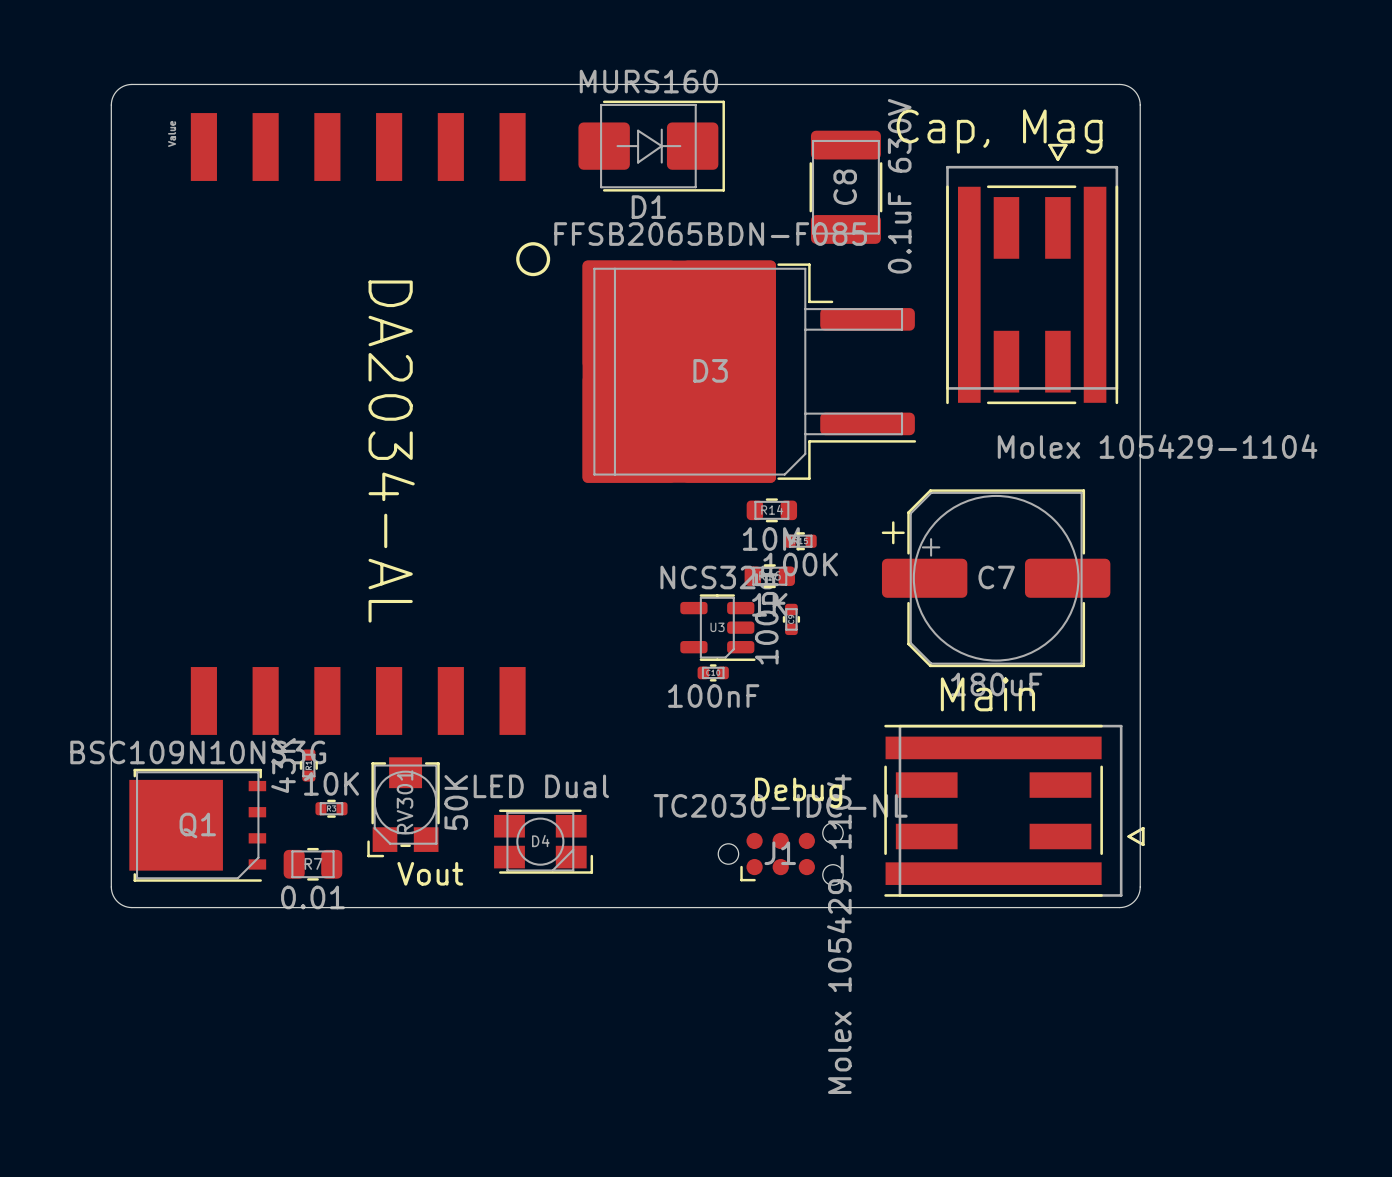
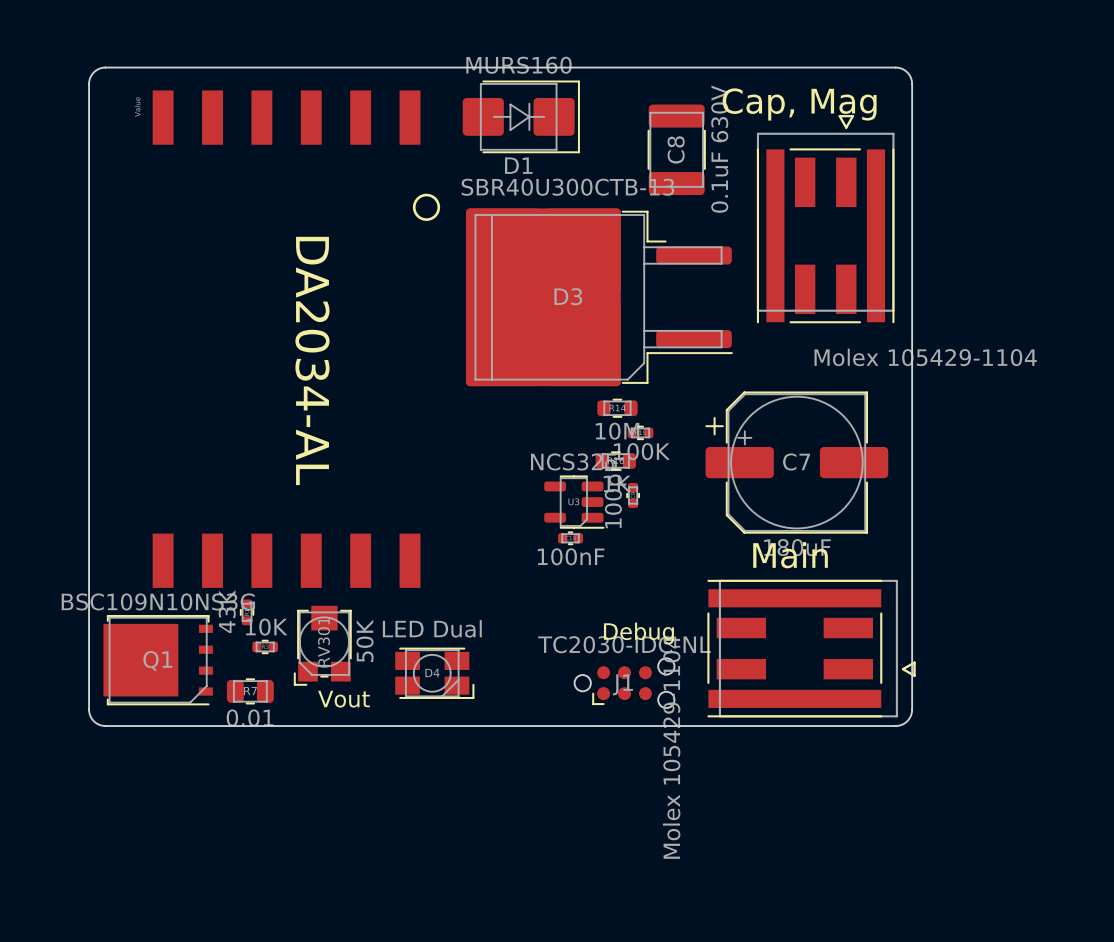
D3 value: FFSB2065BDN-F085 (710, 234) -> SBR40U300CTB-13 (567, 187)

